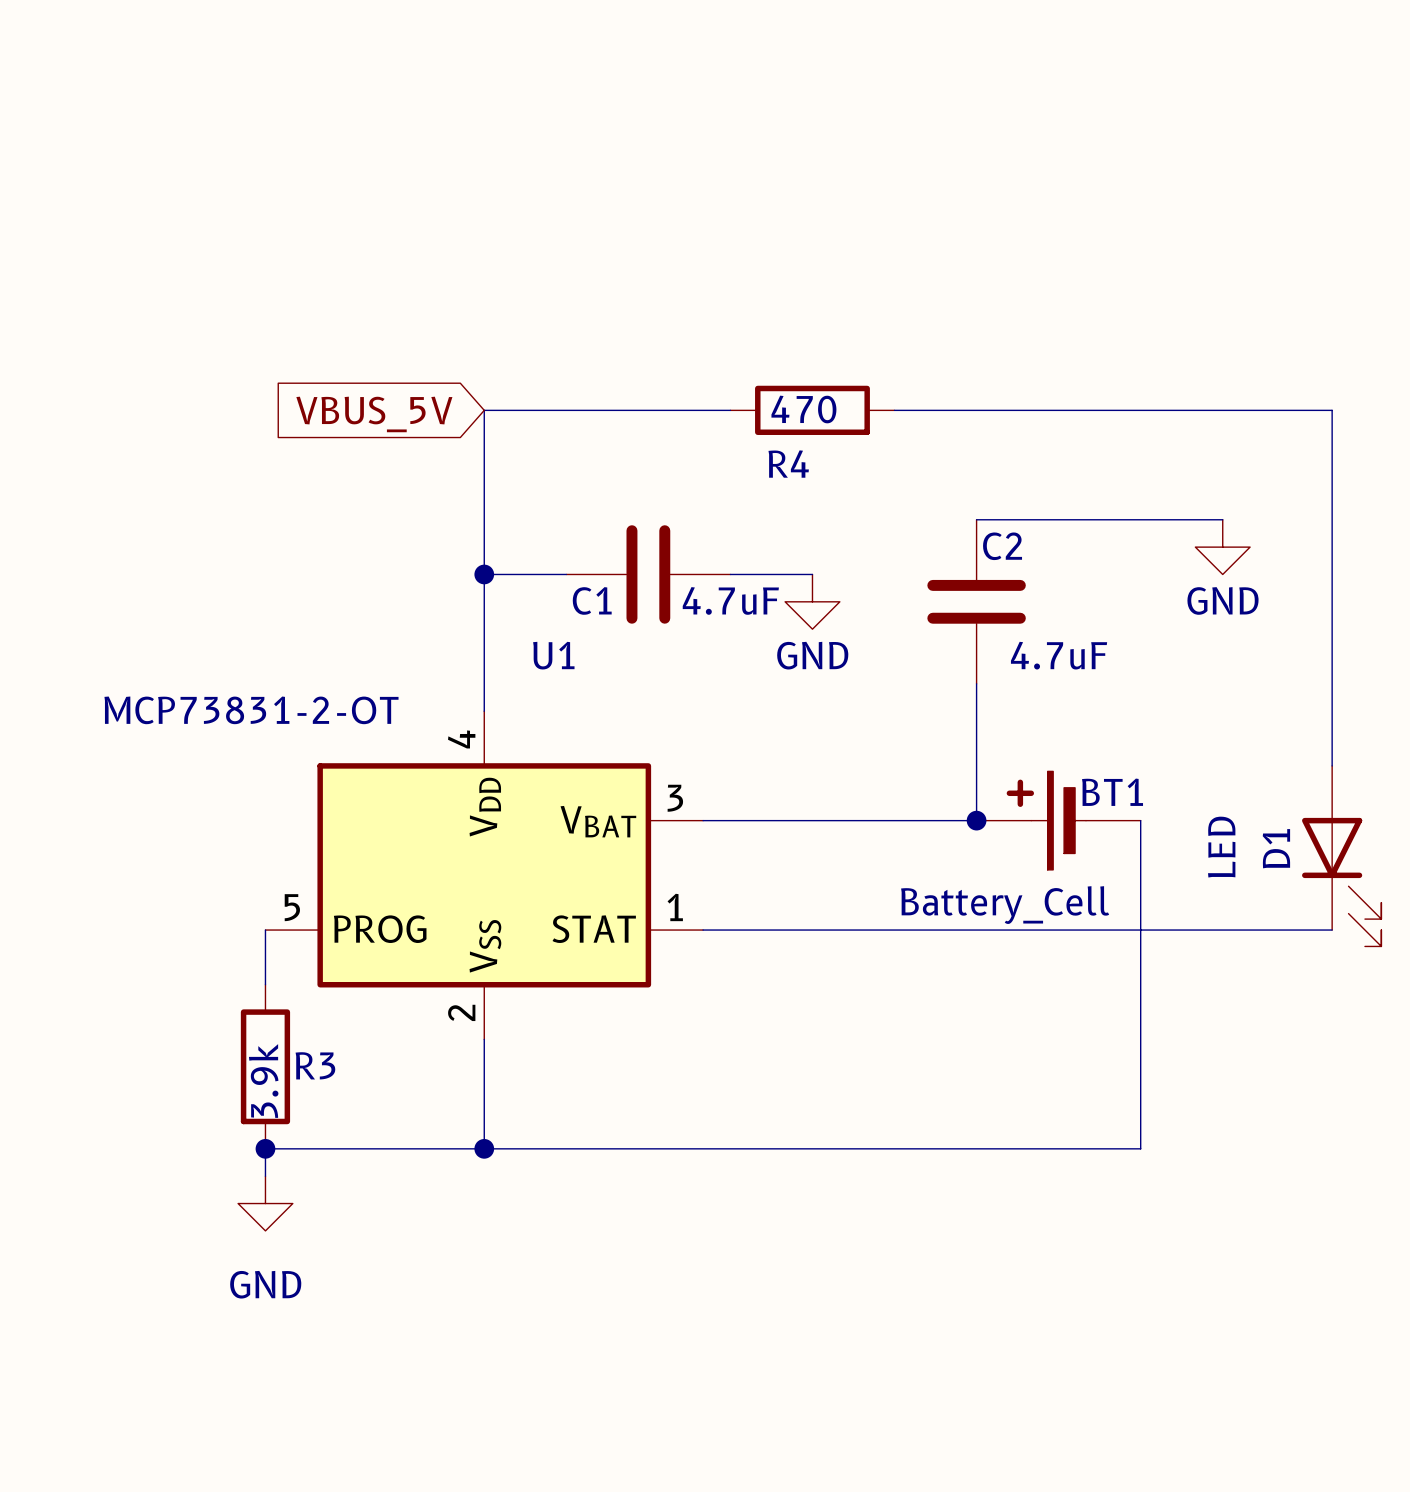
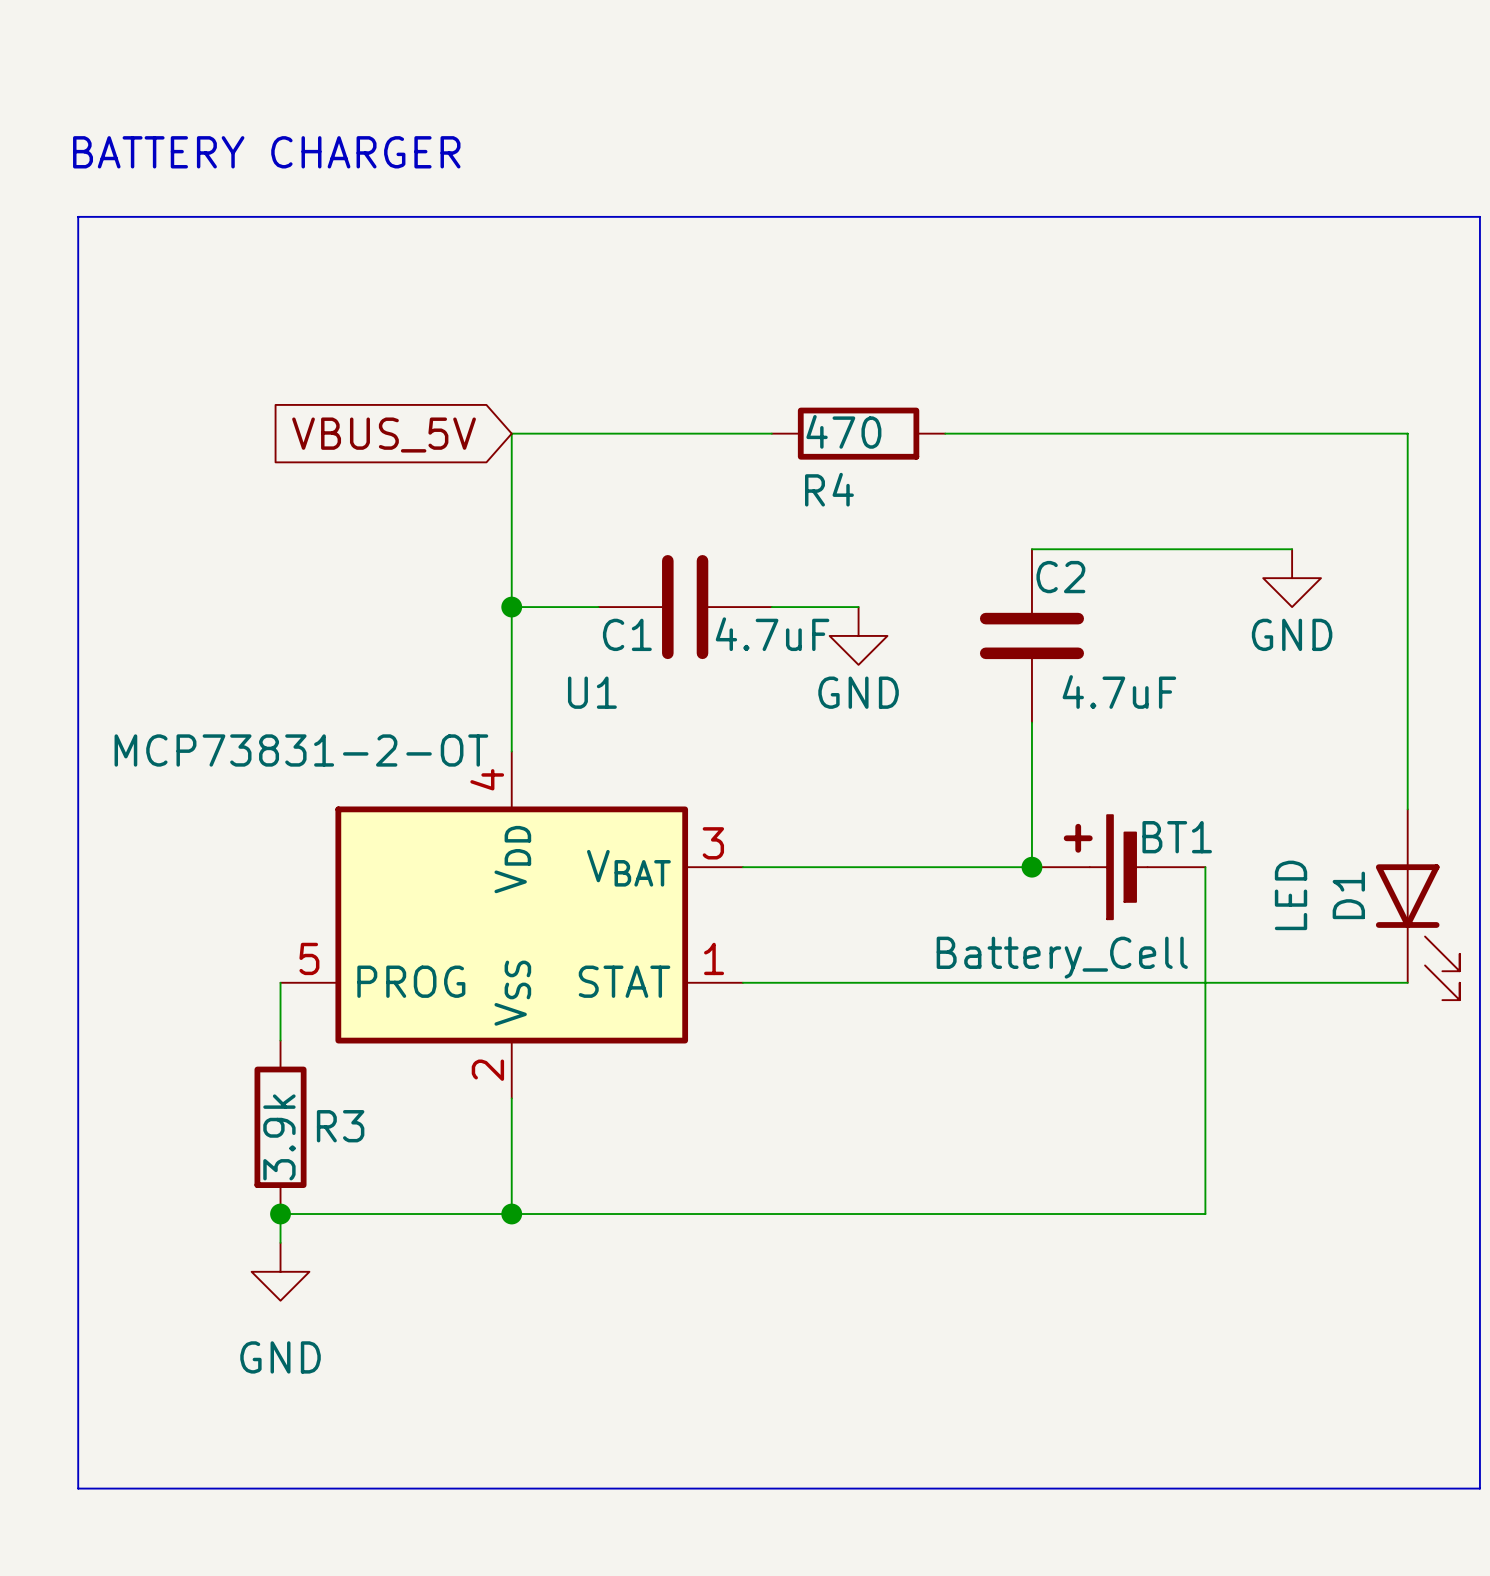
text: none -> BATTERY CHARGER (266, 152)
line: none -> (78, 216) (1479, 216) (1479, 1488) (78, 1488) (78, 216)

